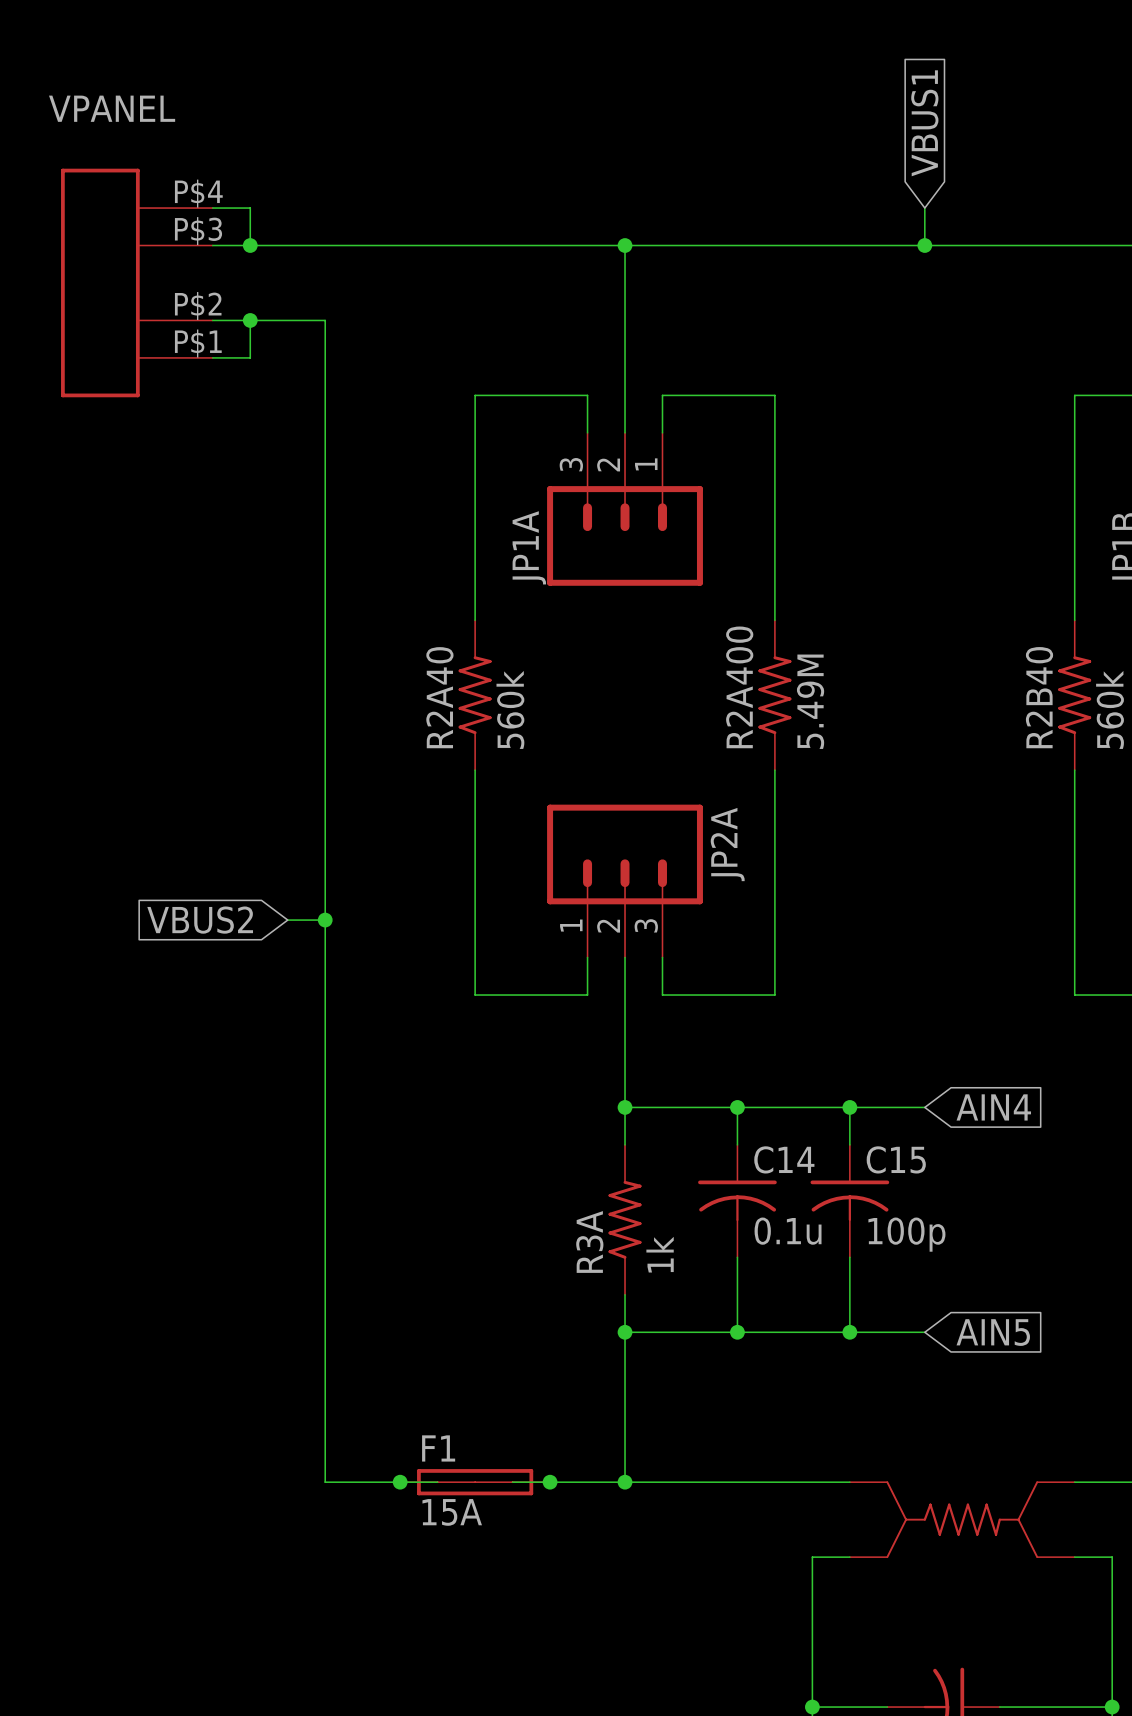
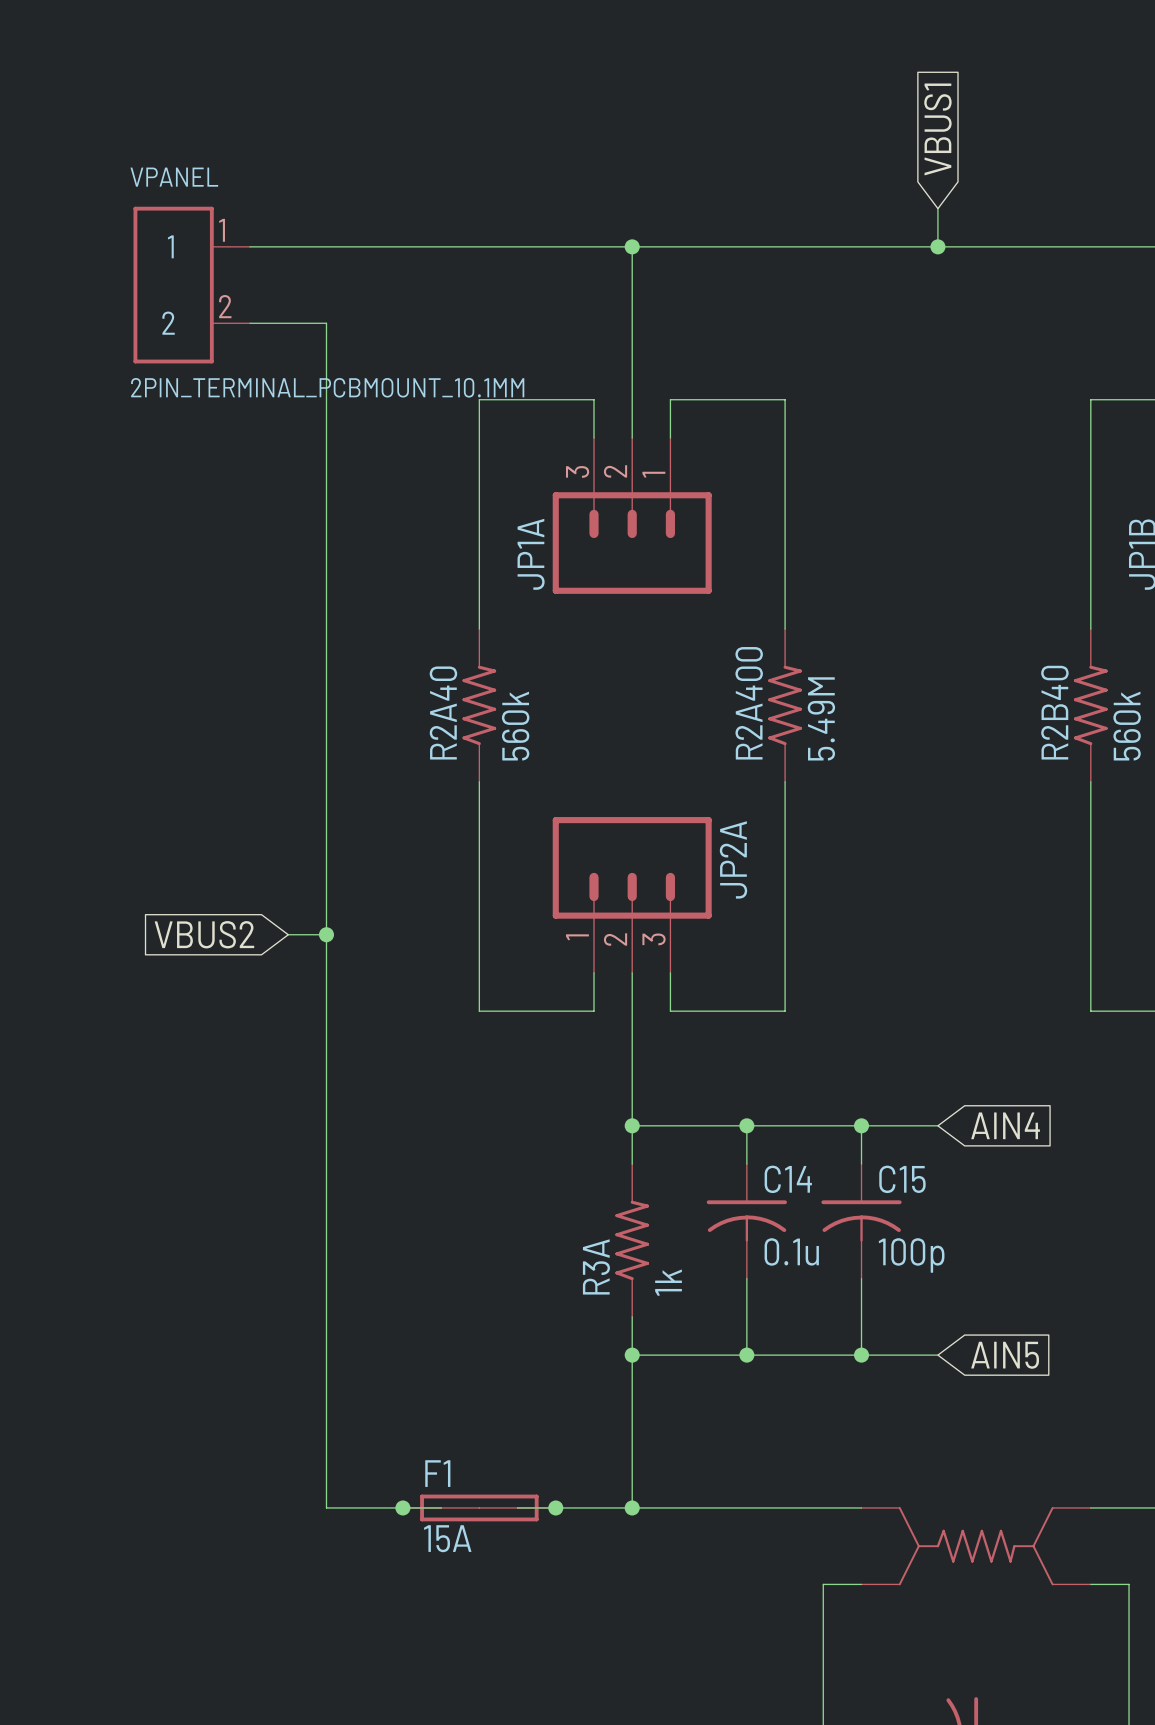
wire: (212, 208) (250, 208) (250, 245) (212, 245) -> none
junction: (250, 245) -> none
VPANEL: (136, 282) -> none
VPANEL: none -> 2PIN_TERMINAL_PCBMOUNT_10.1MM (191, 285)
wire: (212, 320) (250, 320) (250, 357) (212, 357) -> none
junction: (250, 320) -> none

